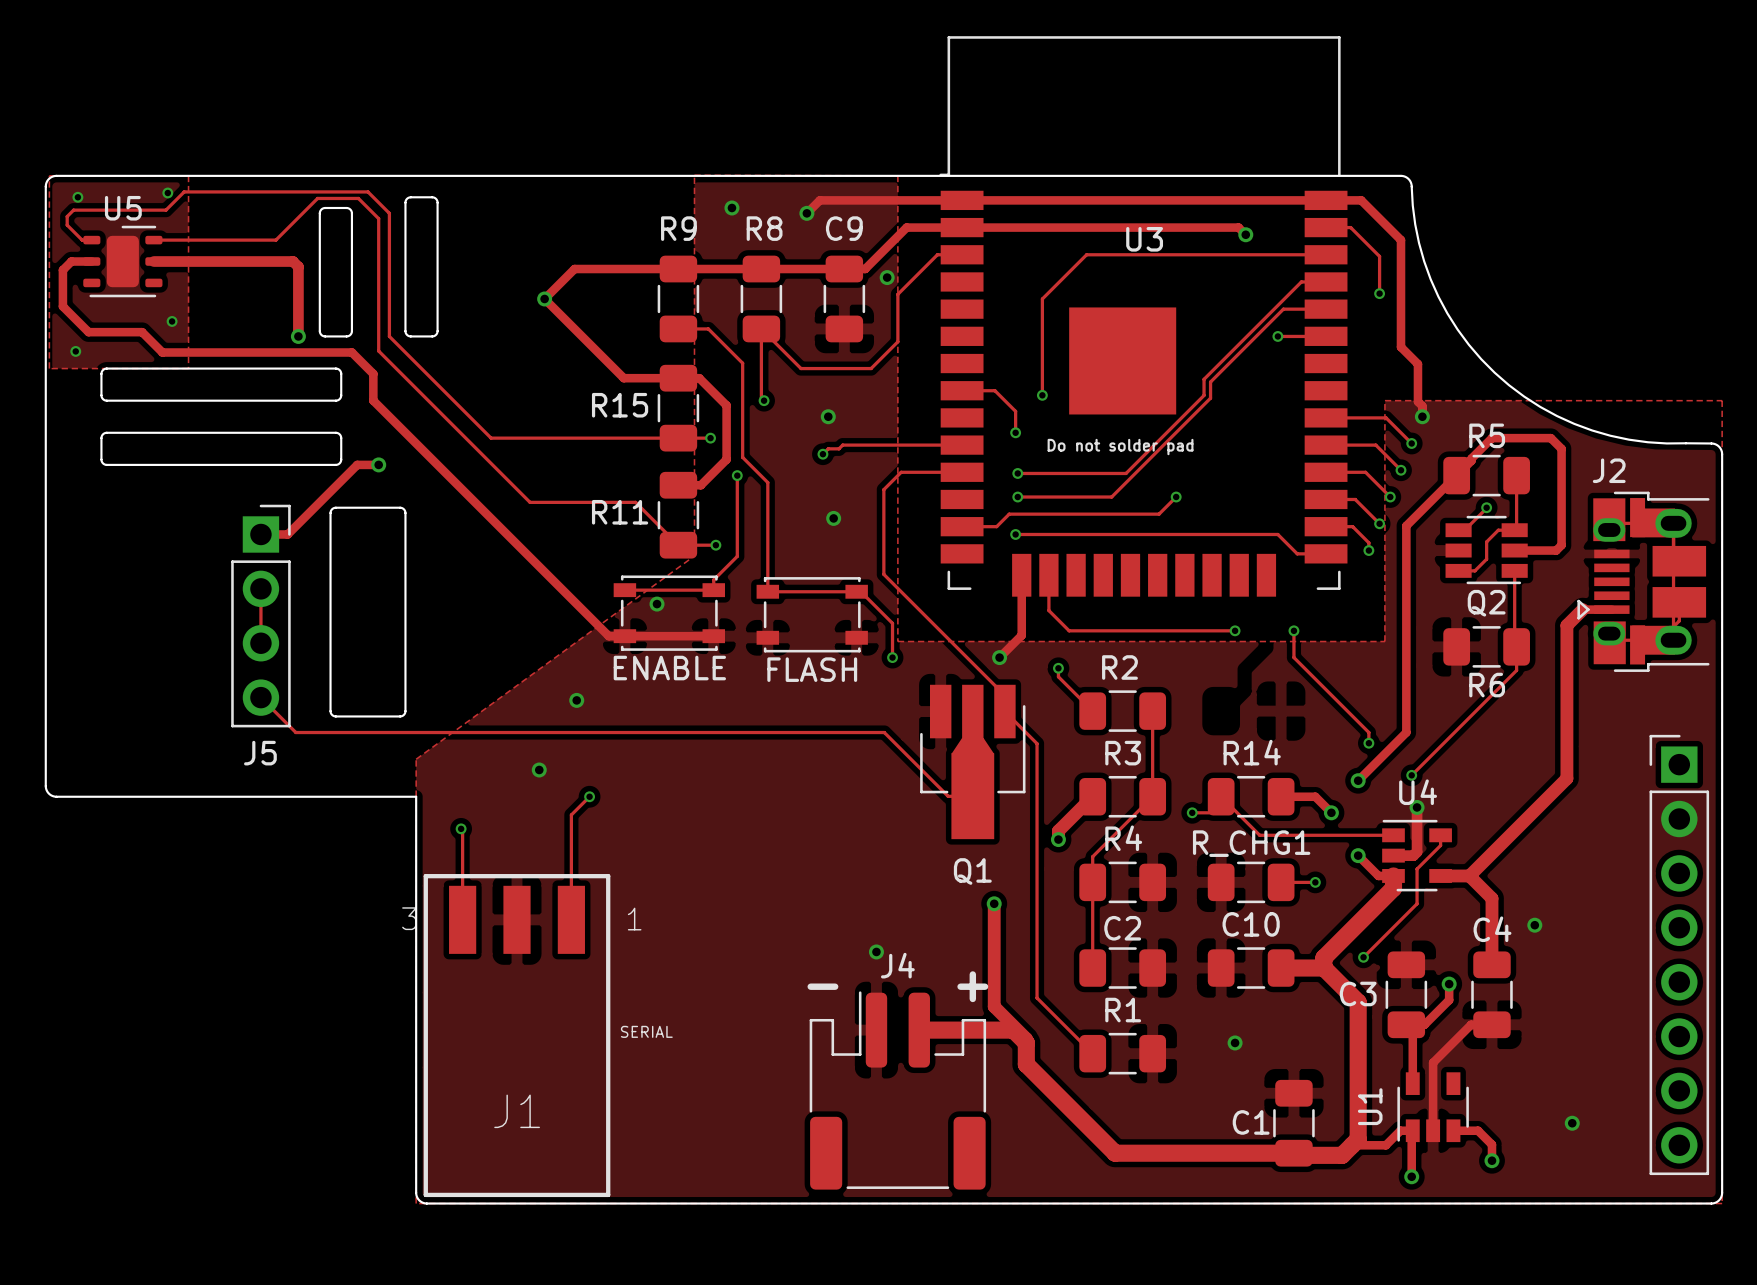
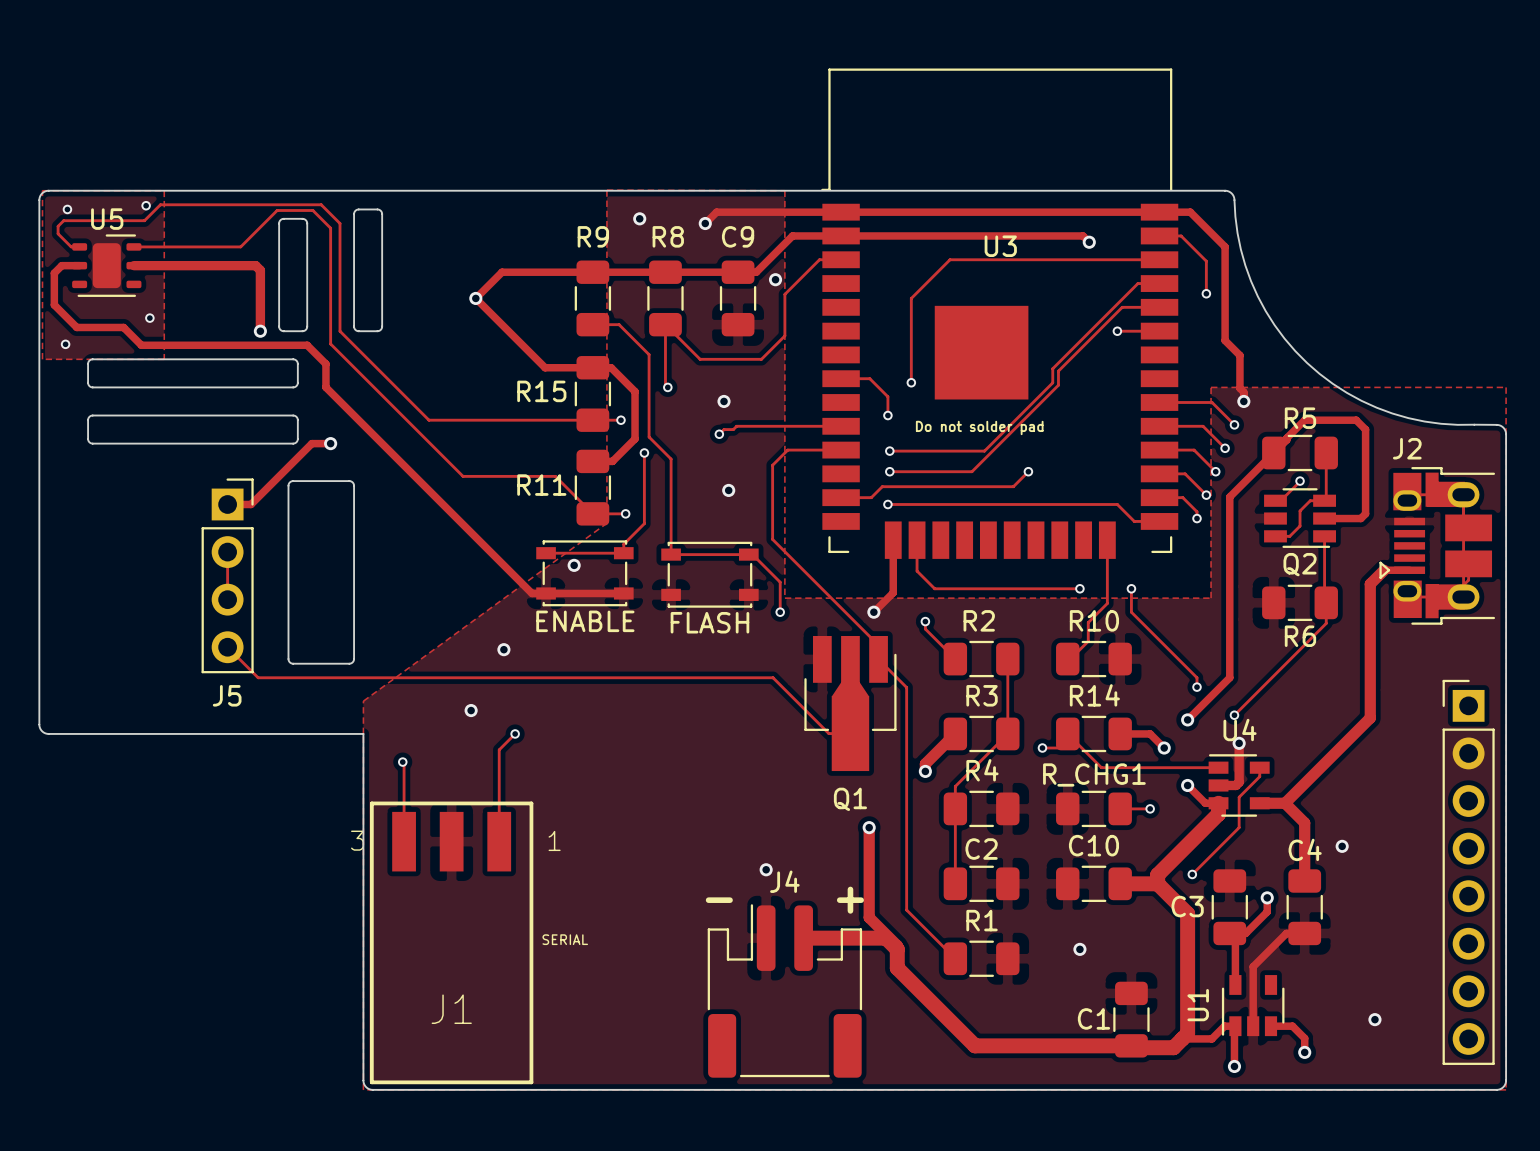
track: none -> (1107, 540) (1107, 603) (1088, 622) (1088, 641) (1075, 654)
R10: none -> (1093, 659)

